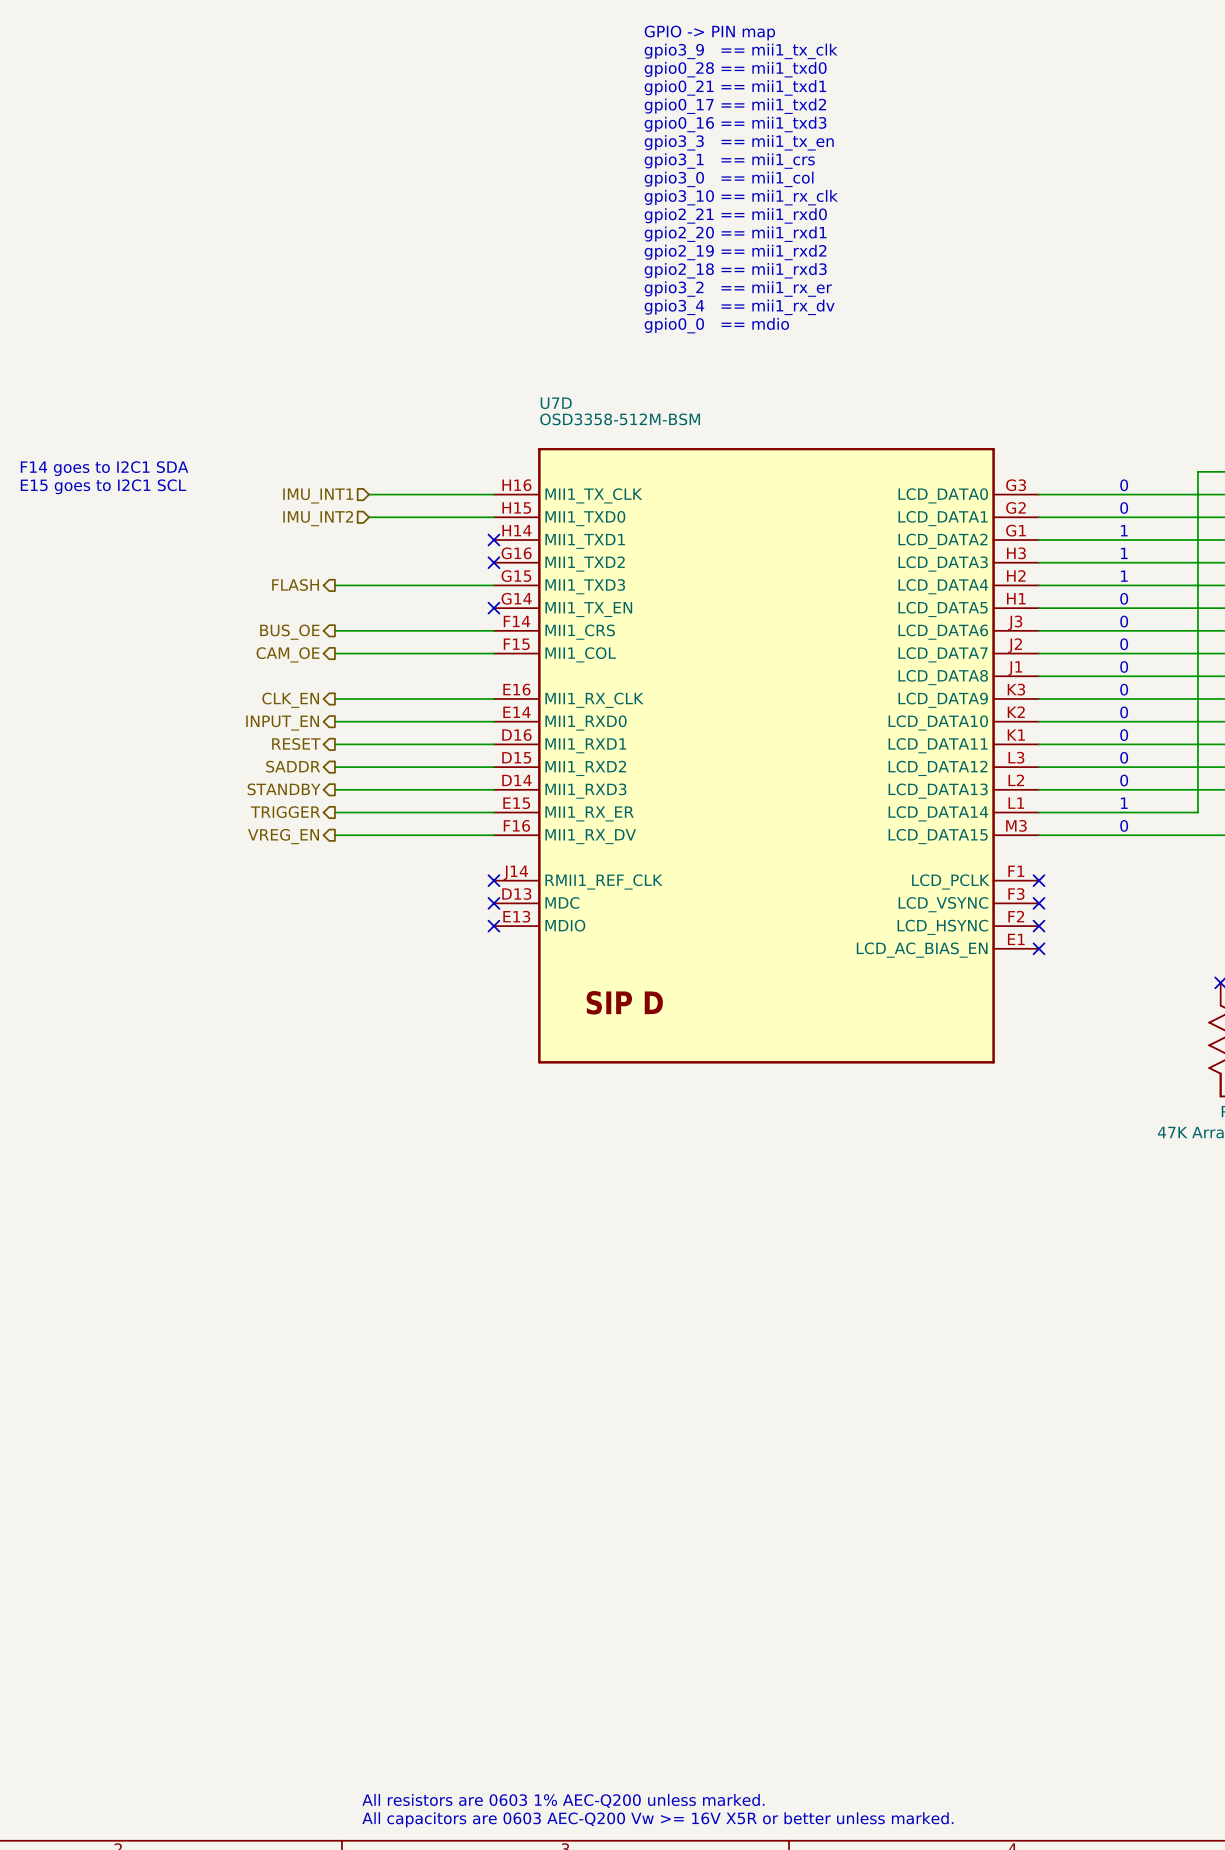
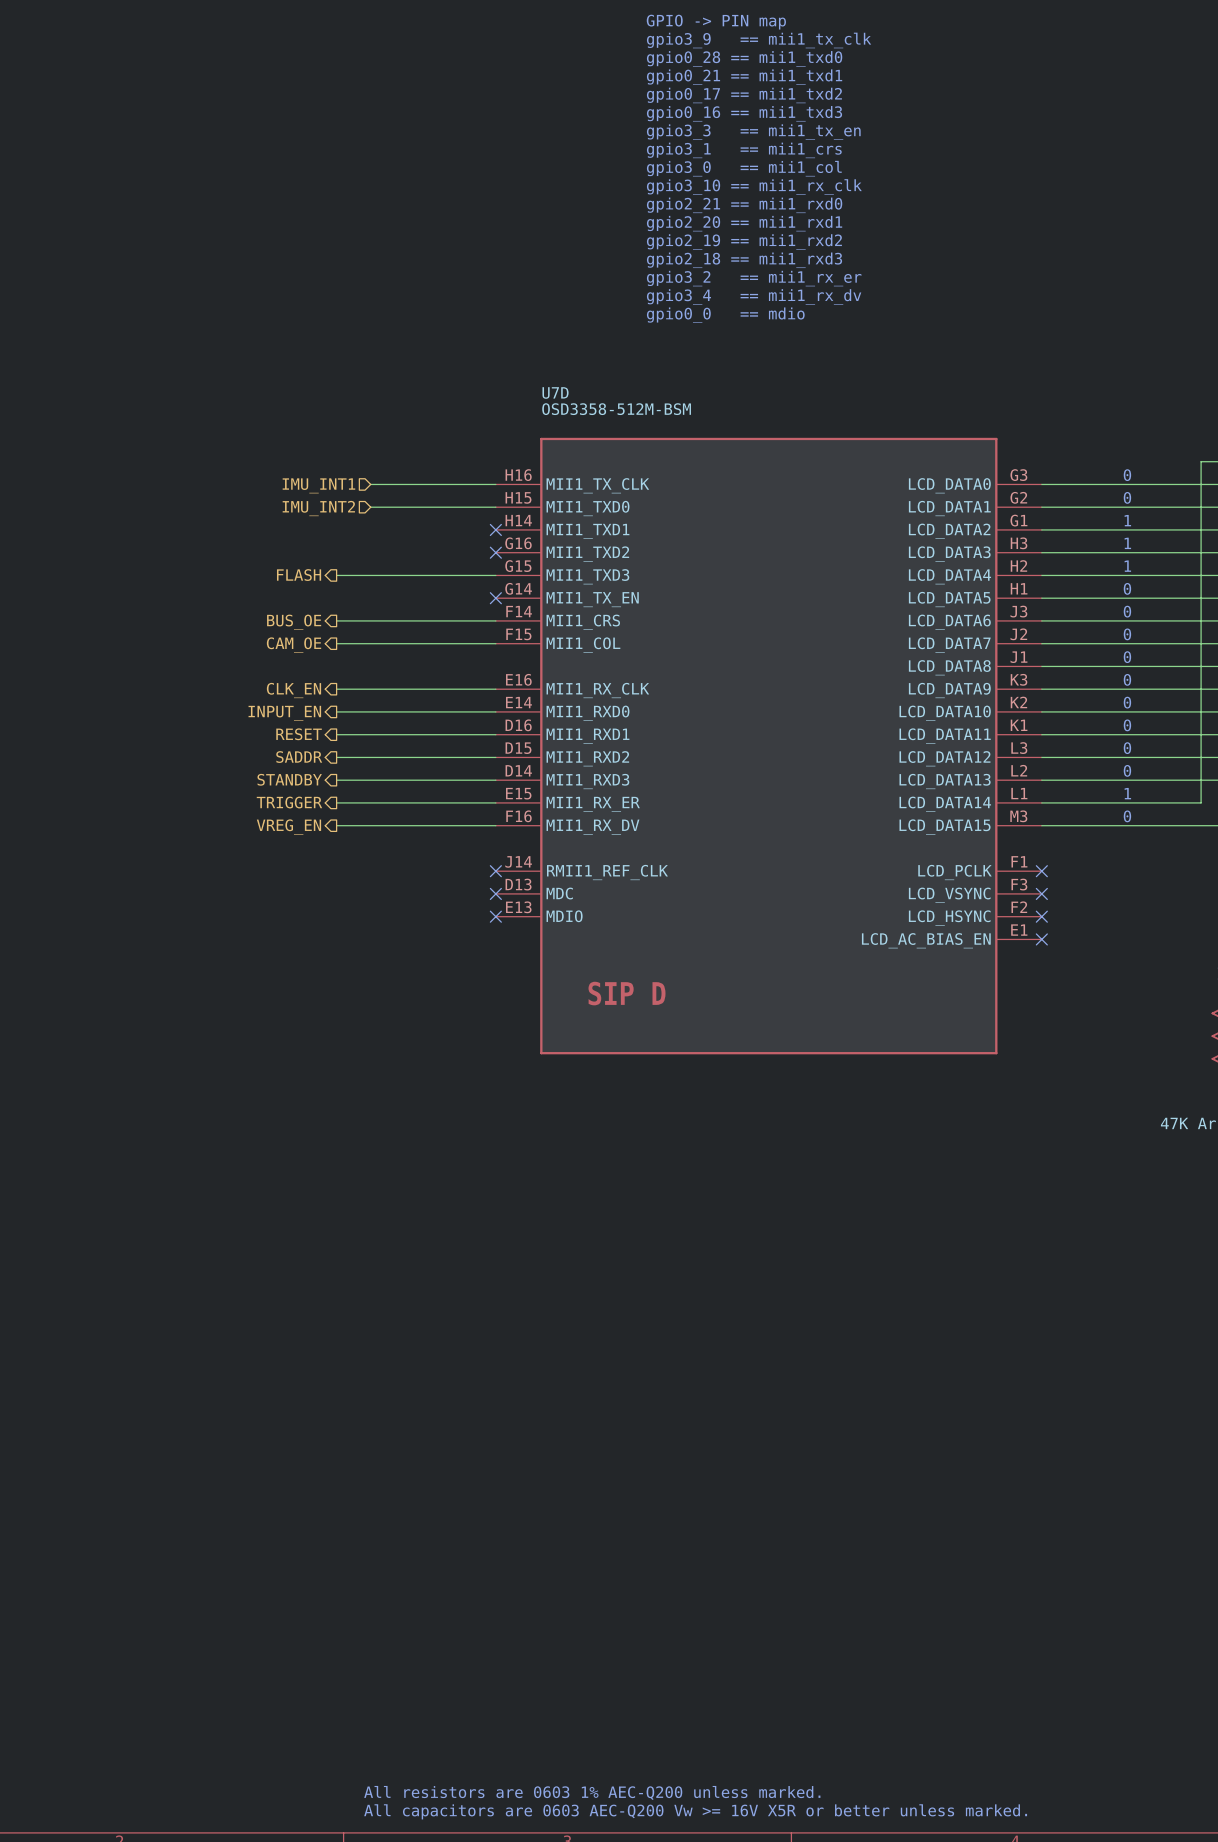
text: F14 goes to I2C1 SDA (104, 468) -> none
text: E15 goes to I2C1 SCL (103, 486) -> none

